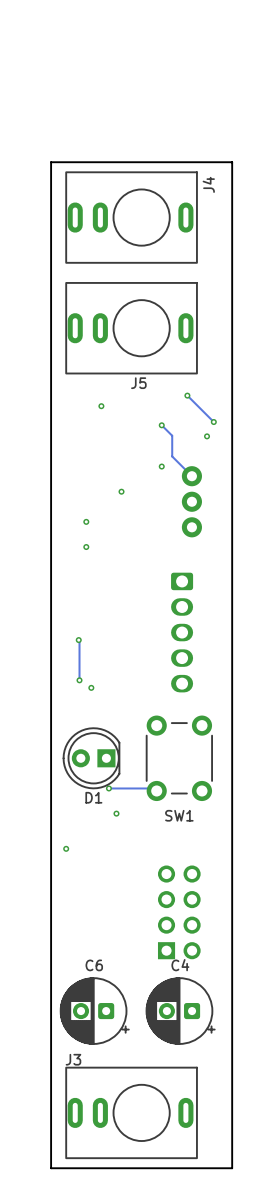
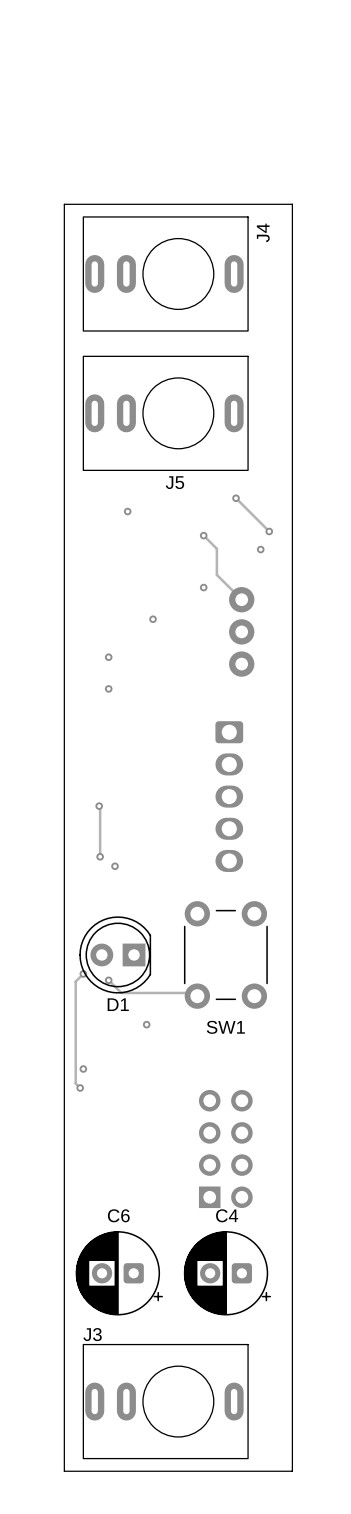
track: none -> (83, 973) (75, 981) (75, 1083) (80, 1088)
via: none -> (83, 973)
track: none -> (108, 980) (121, 992) (137, 992)
via: none -> (108, 980)
via: (108, 788) -> none
via: none -> (80, 1088)

